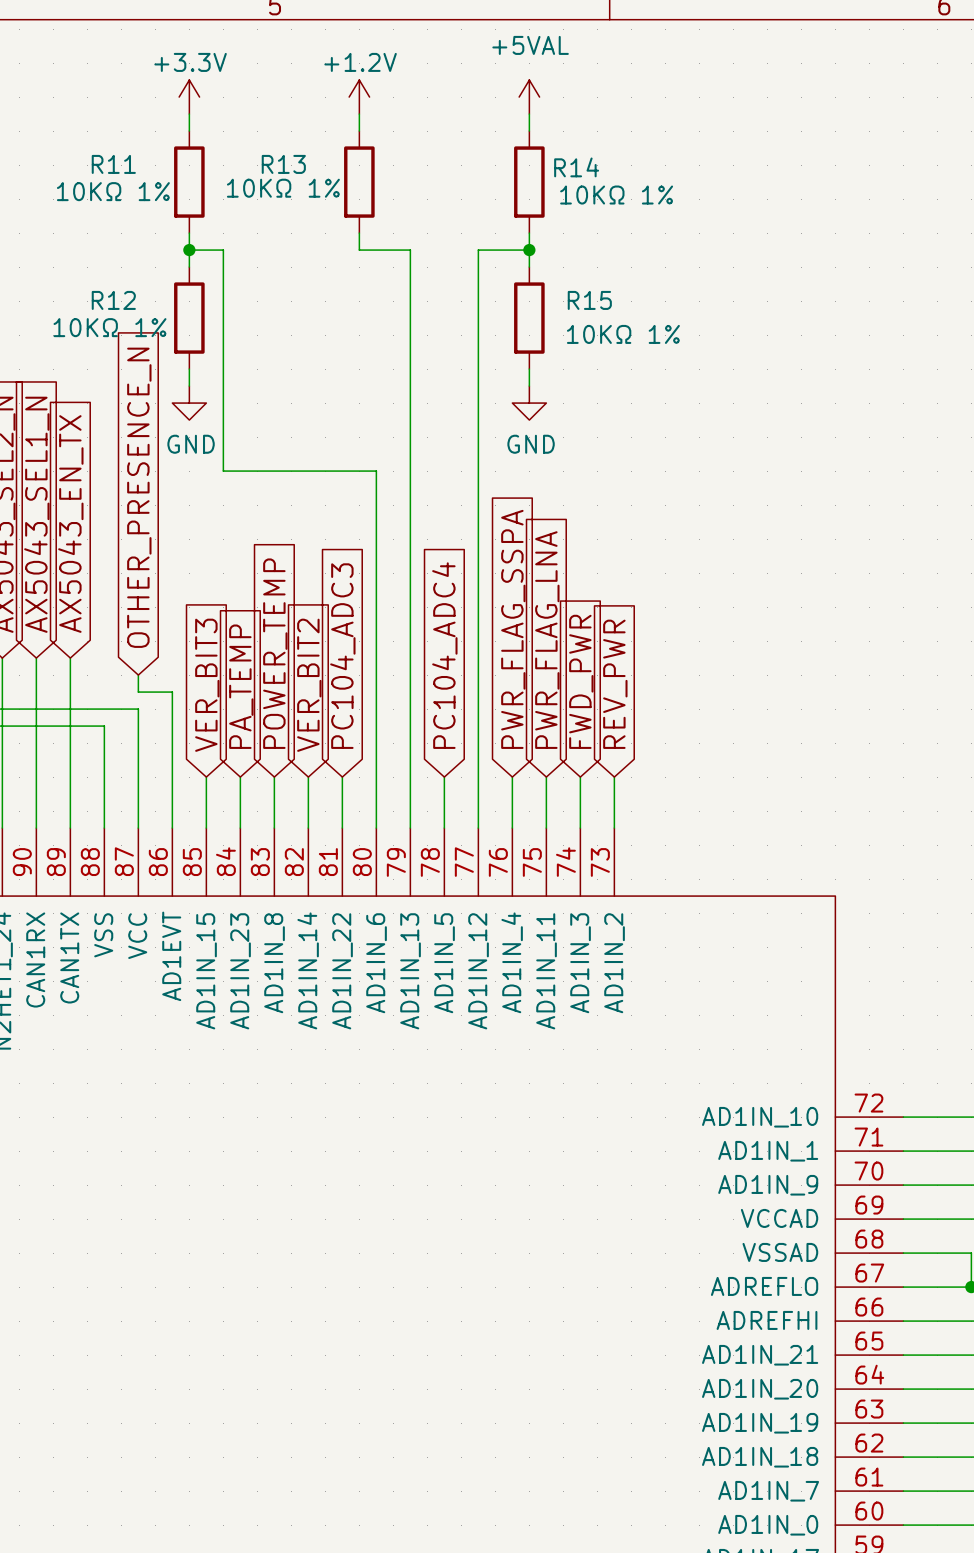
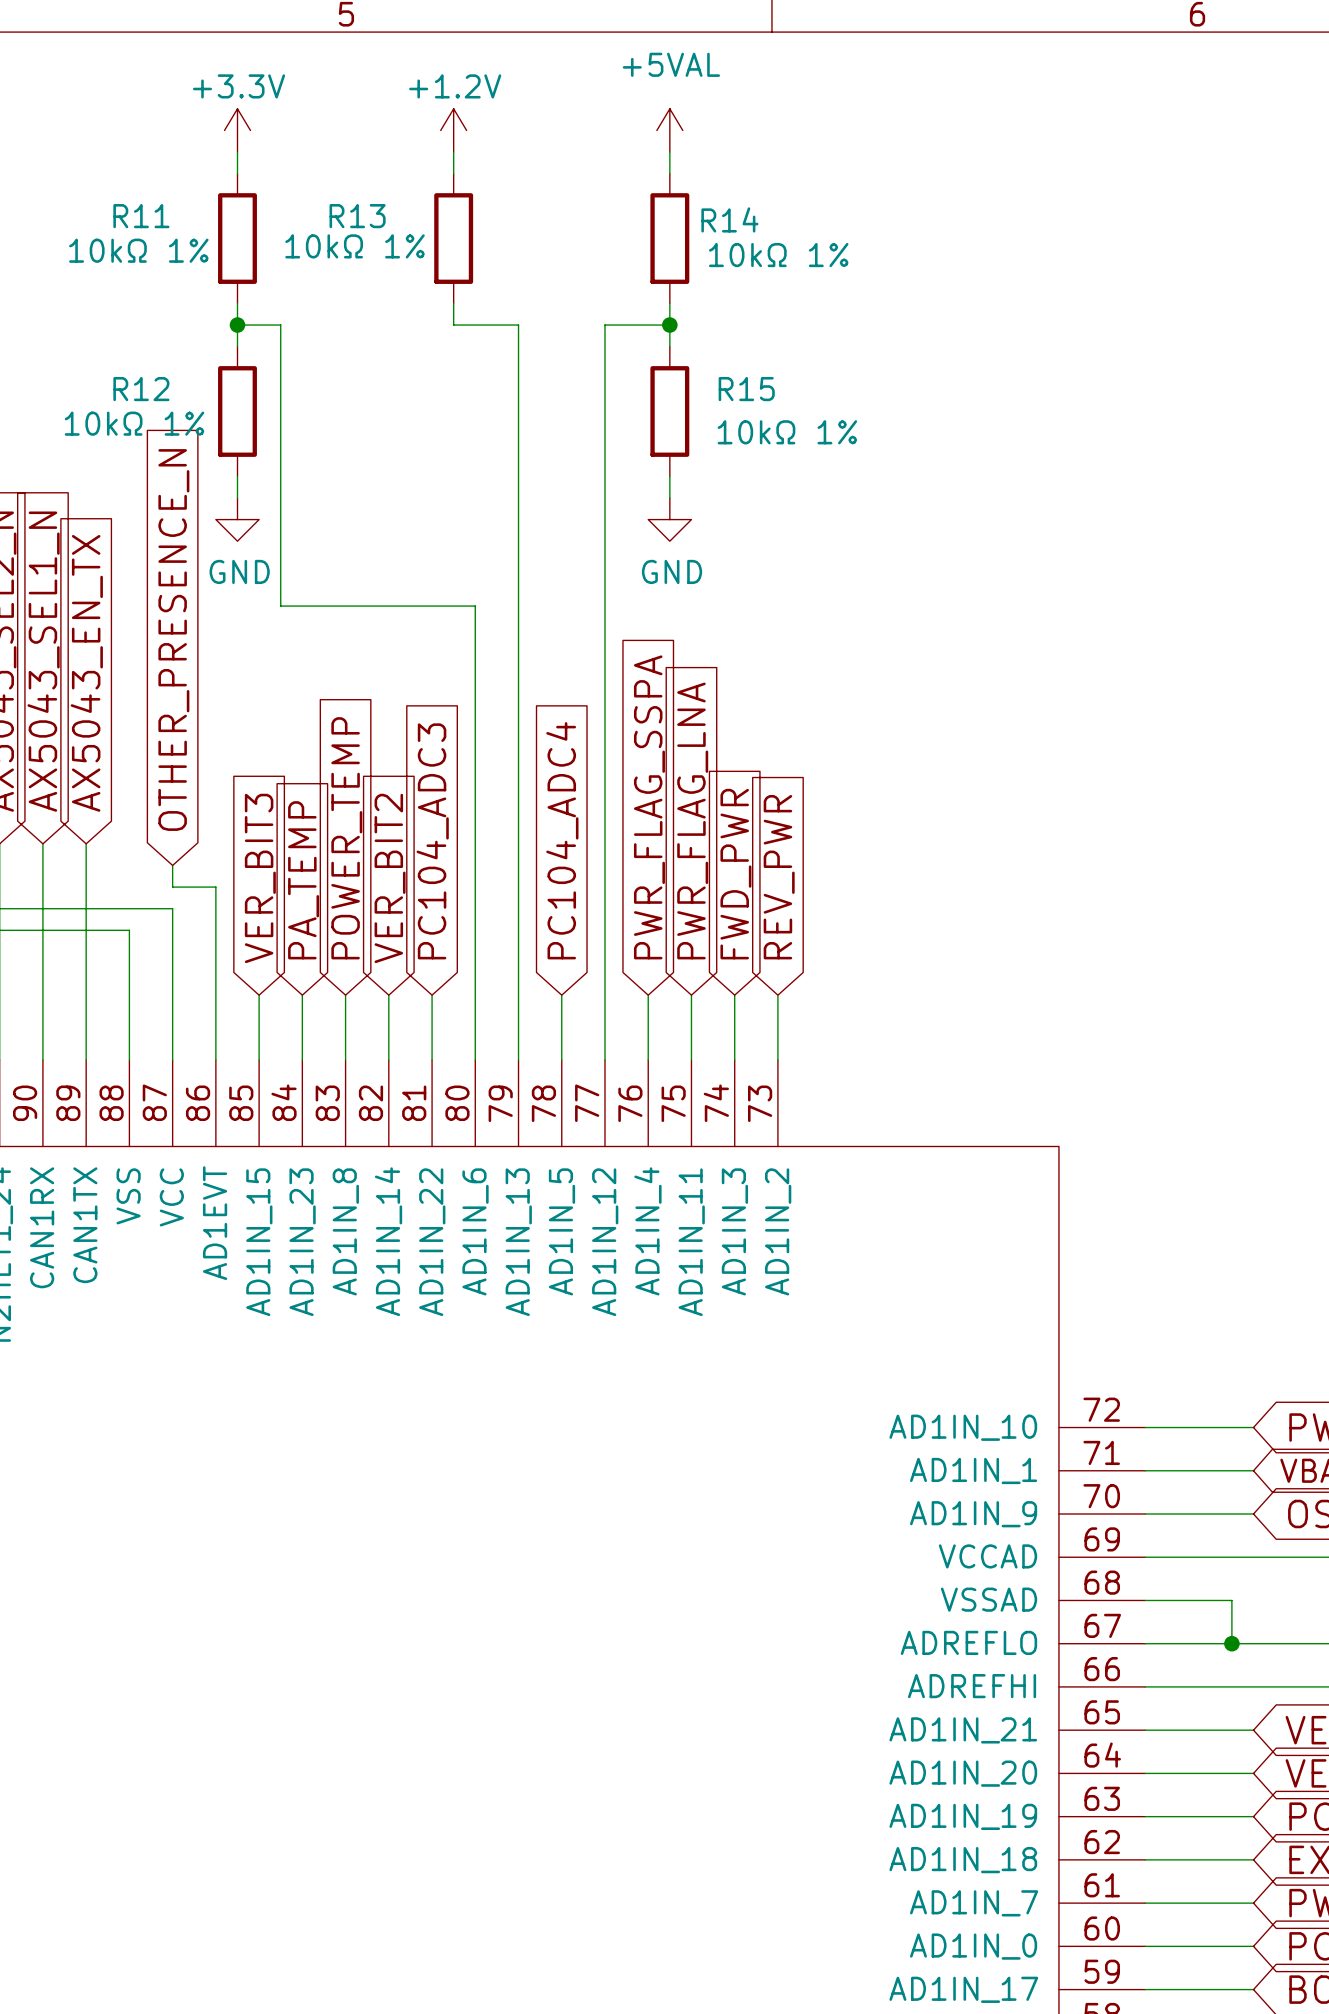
R13 value: 10KΩ 1% (283, 188) -> 10kΩ 1% (355, 246)
R11 value: 10KΩ 1% (113, 191) -> 10kΩ 1% (138, 250)
R14 value: 10KΩ 1% (616, 195) -> 10kΩ 1% (778, 255)
R12 value: 10KΩ 1% (109, 327) -> 10kΩ 1% (134, 423)
R15 value: 10KΩ 1% (623, 334) -> 10kΩ 1% (787, 432)

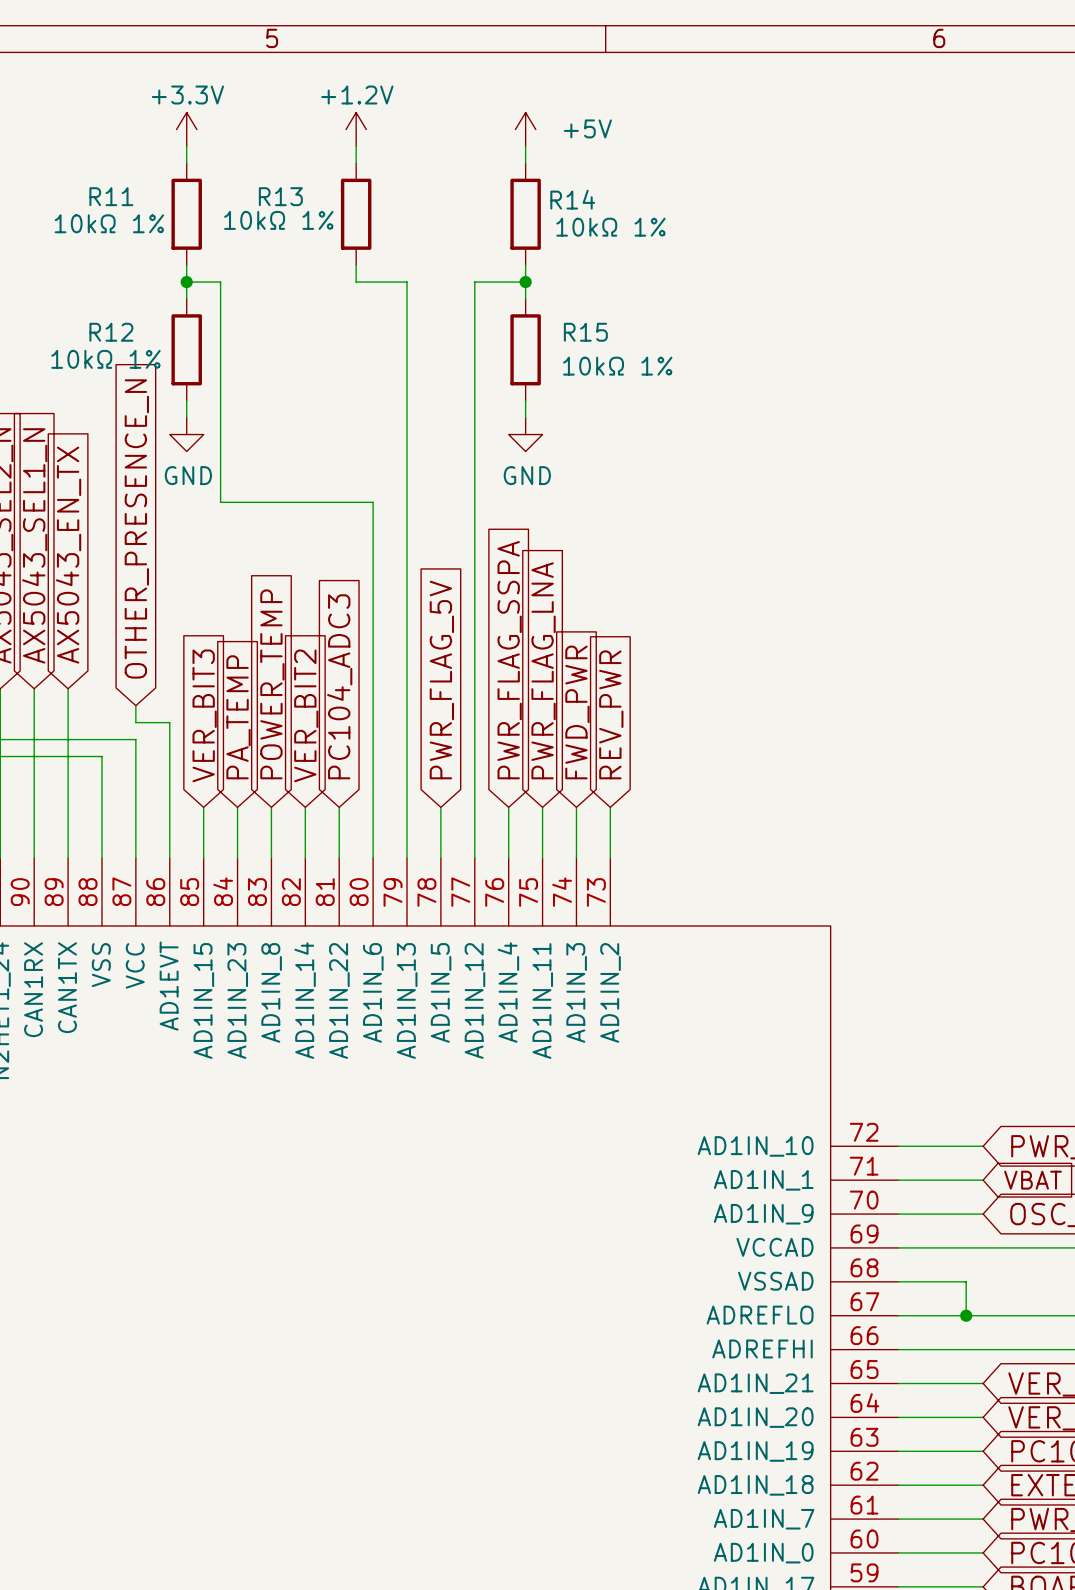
power symbol: +5VAL (669, 130) -> +5V (525, 129)
global label: PC104_ADC4 (562, 840) -> PWR_FLAG_5V (441, 680)

